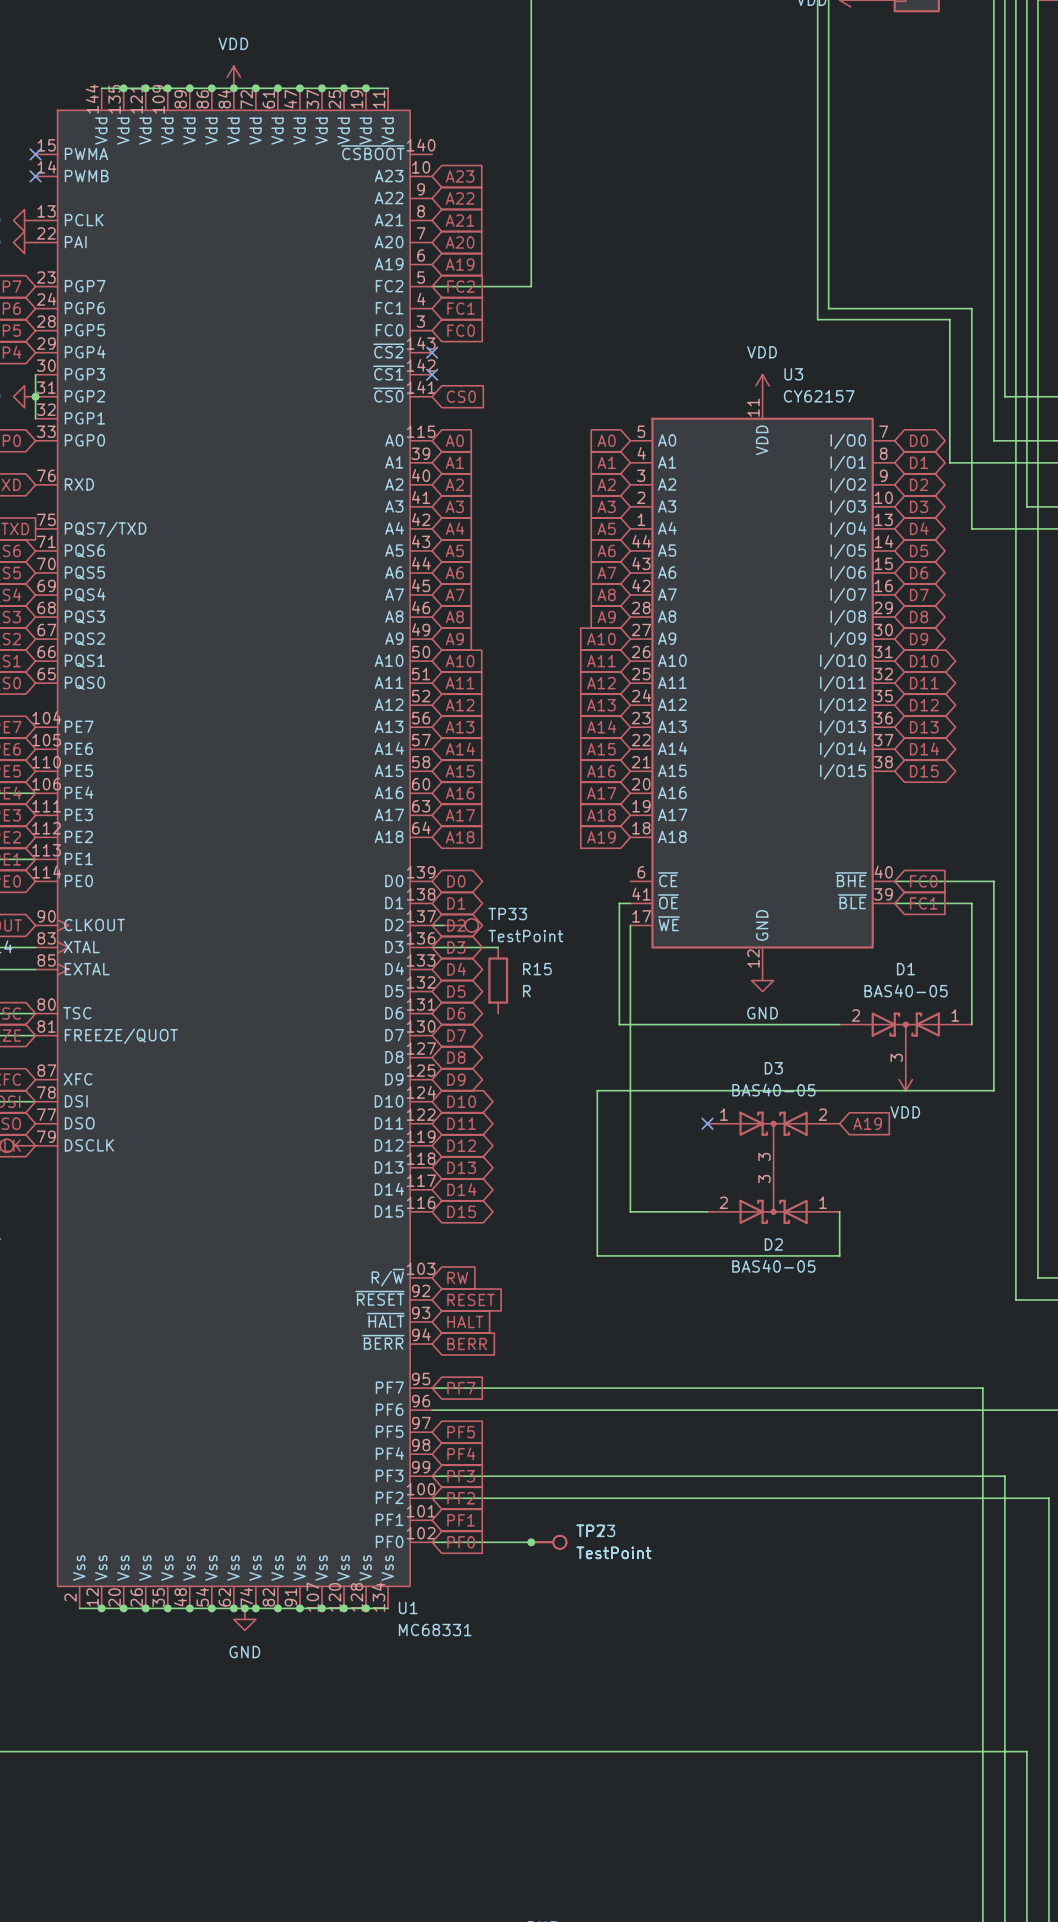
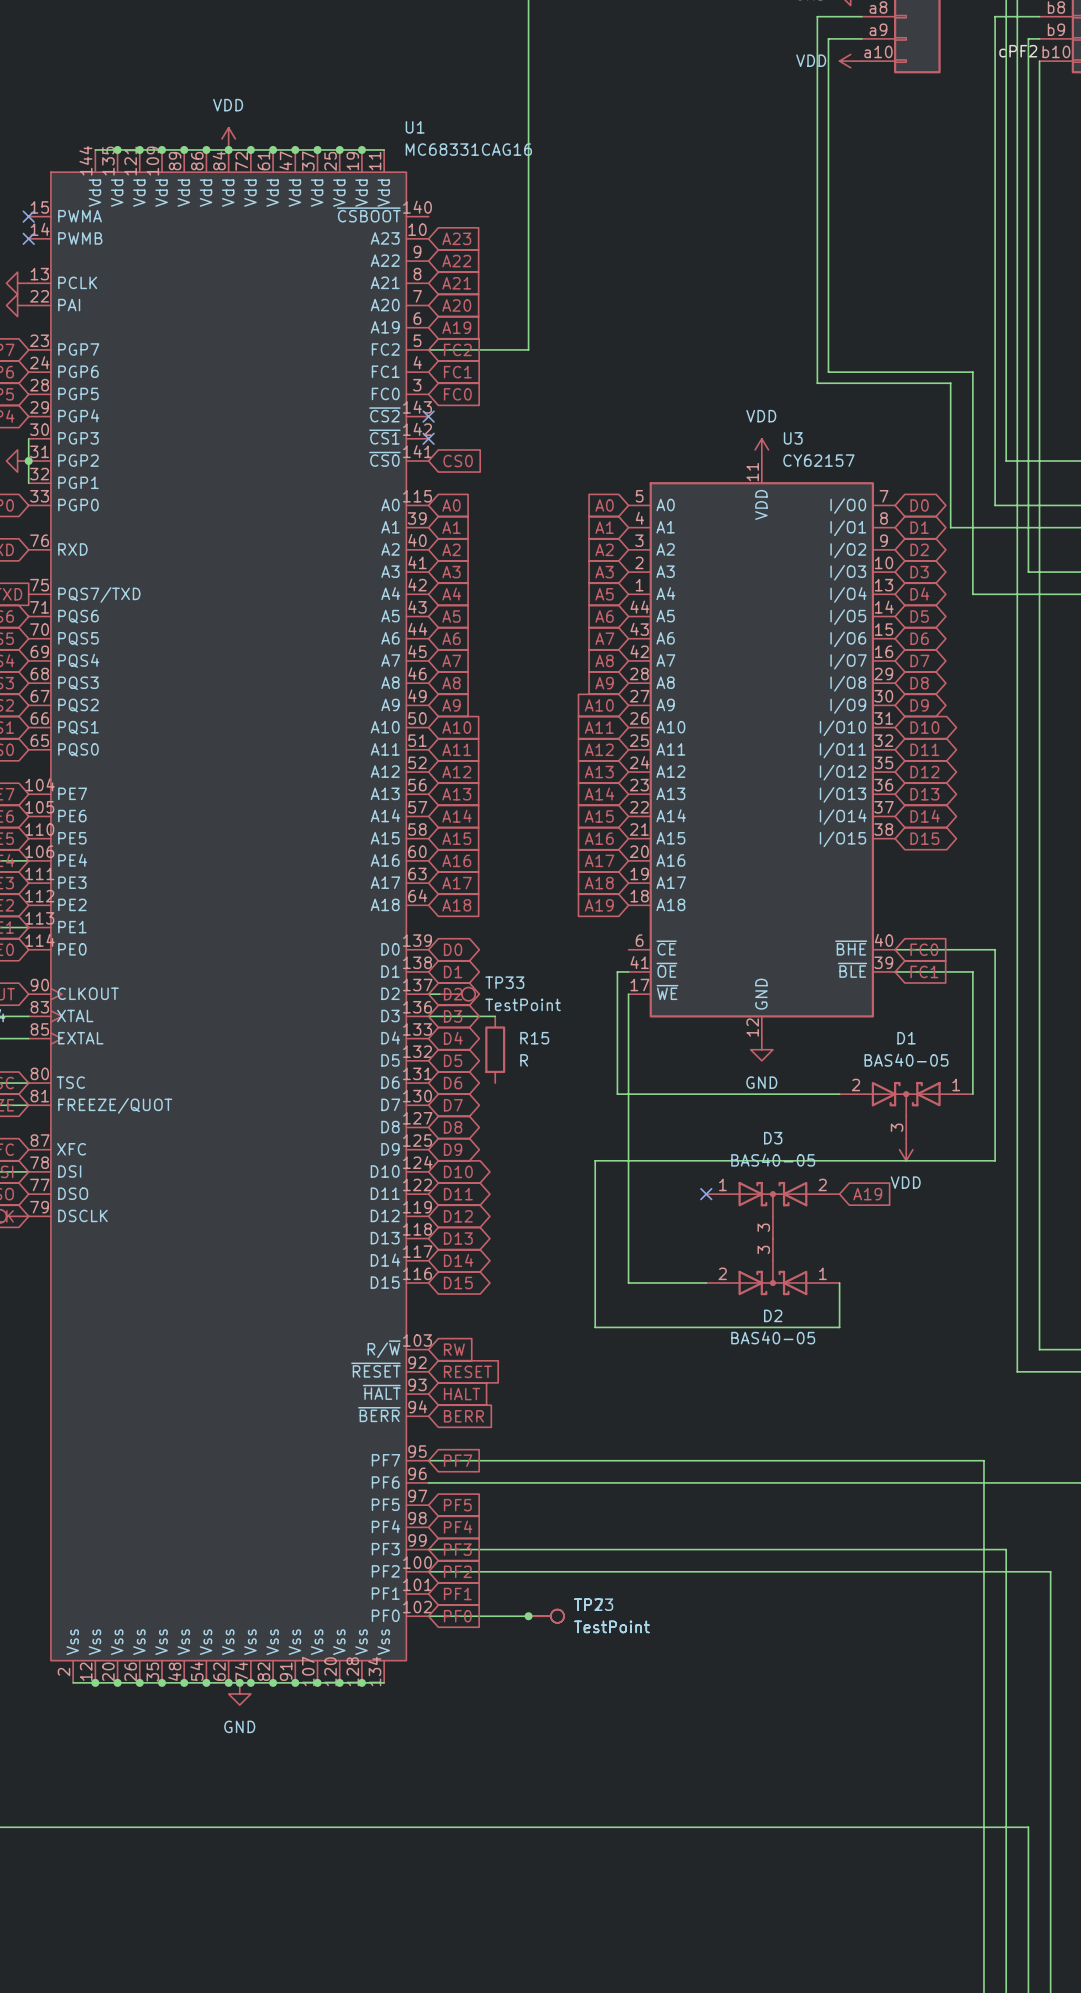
U1 name position: U1 (408, 1607) -> U1 (415, 127)
U1 value: MC68331 (435, 1630) -> MC68331CAG16 (468, 149)

